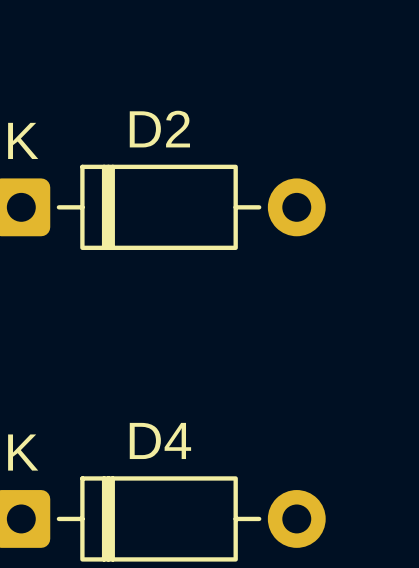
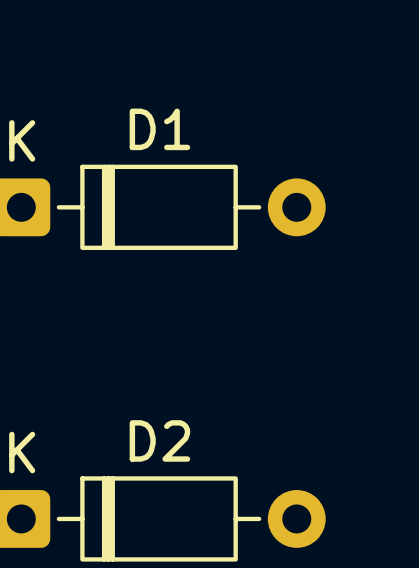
D2 name: D2 (159, 129) -> D1 (159, 129)
D4 name: D4 (160, 440) -> D2 (159, 440)

